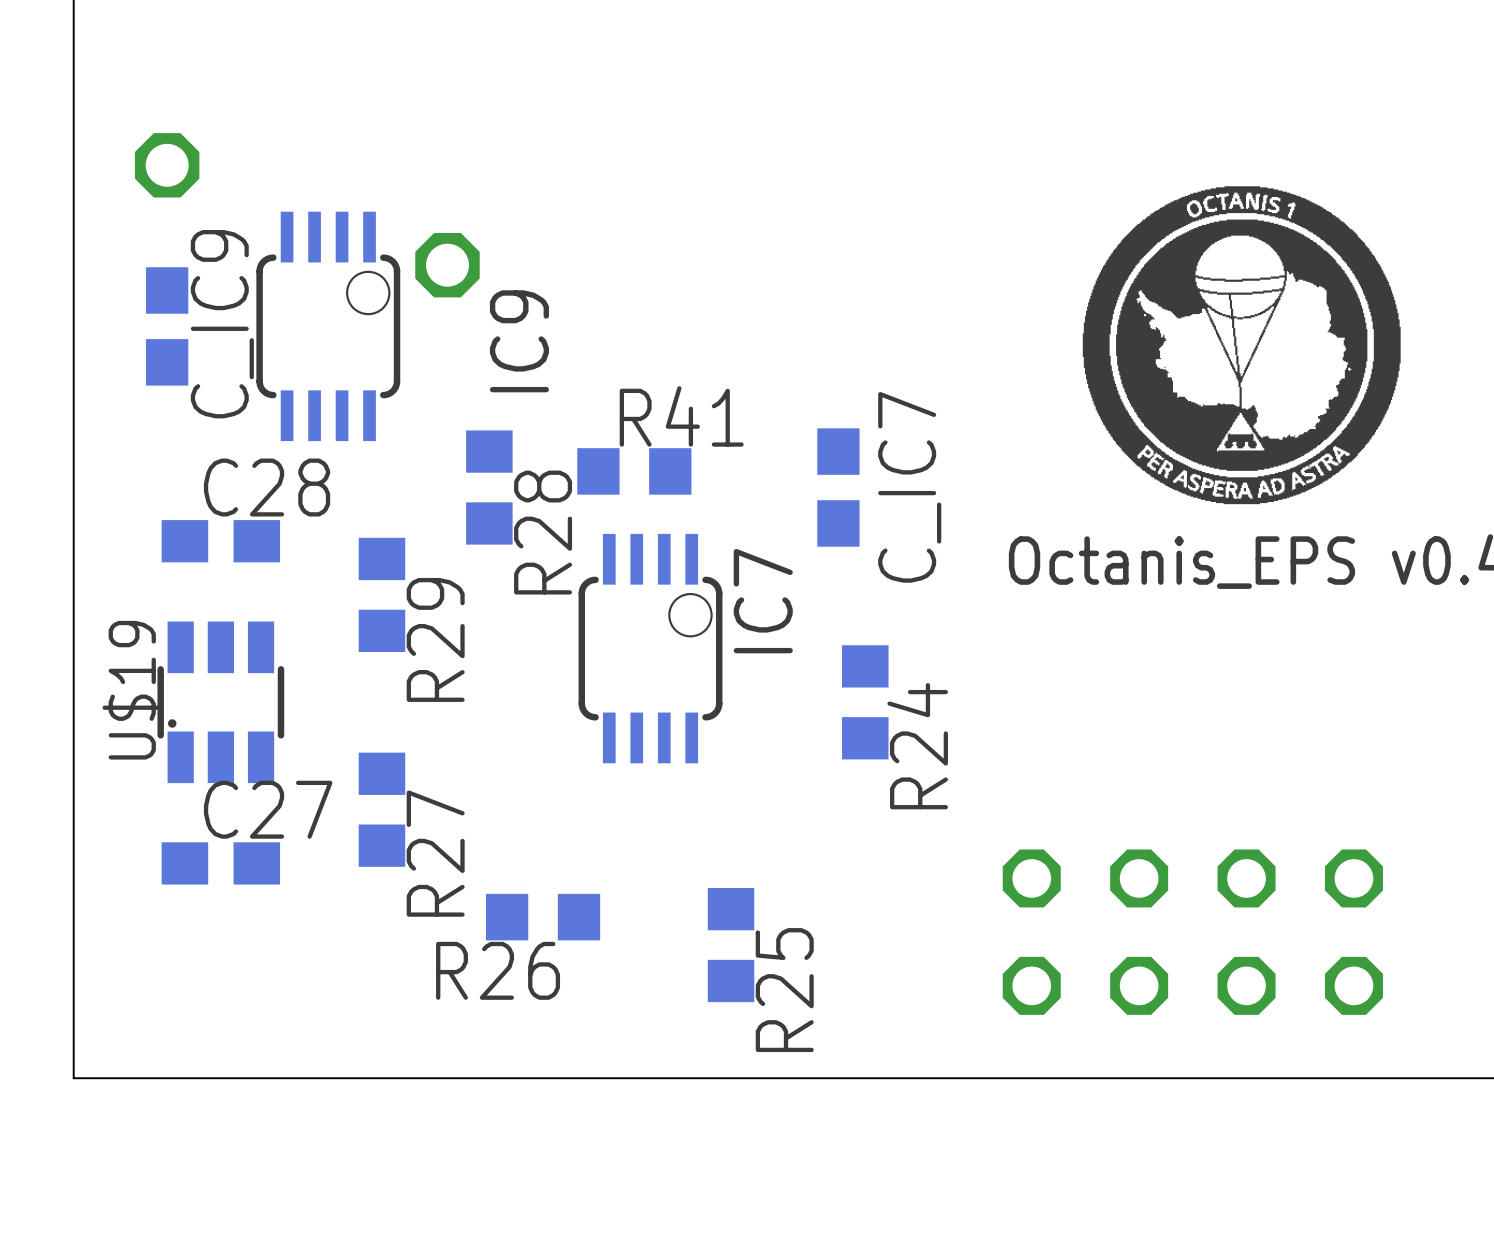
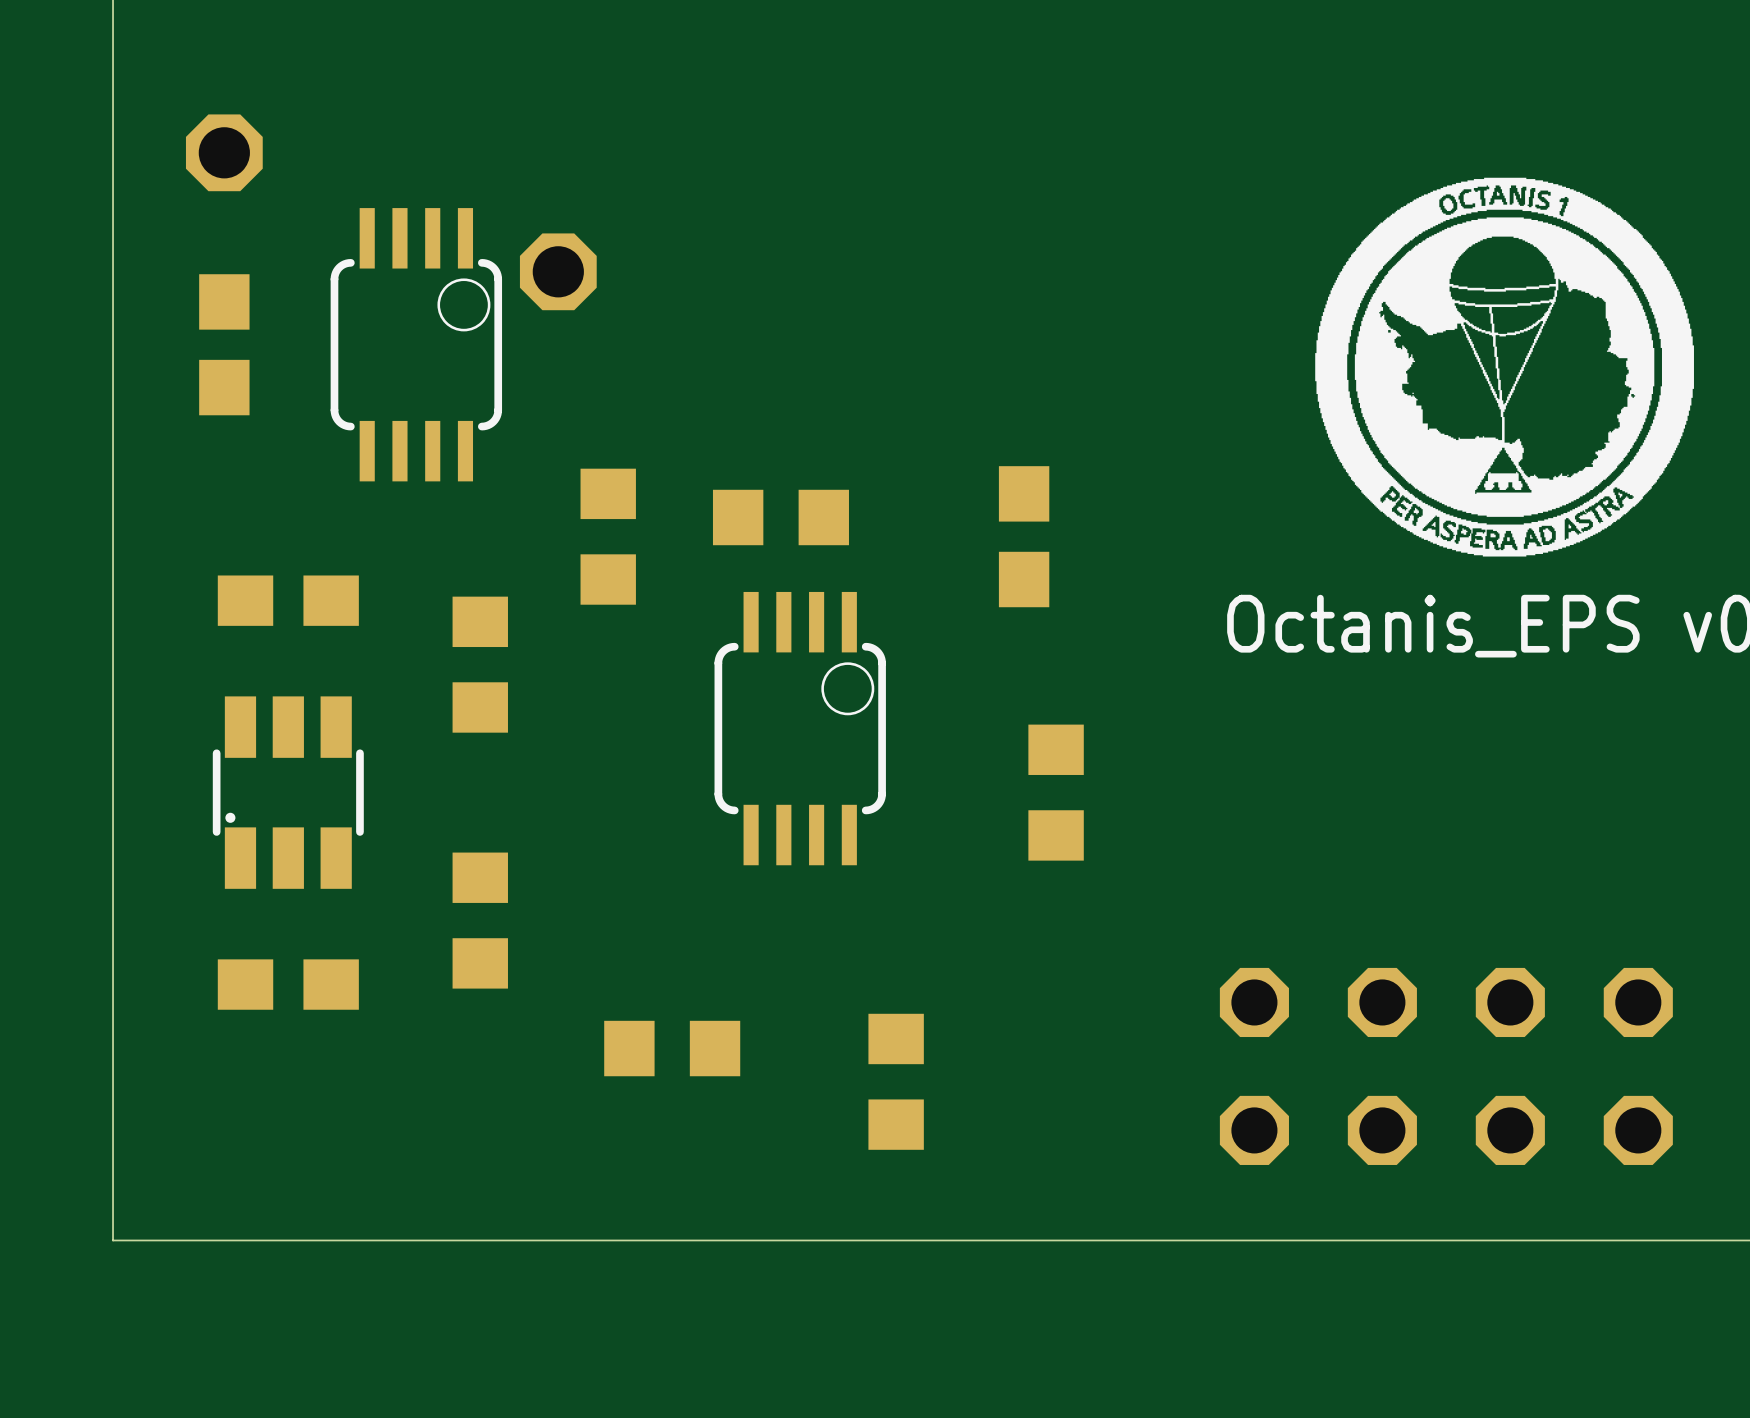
C_IC9 name: C_IC9 (222, 324) -> none
IC9 name: IC9 (519, 341) -> none
R41 name: R41 (681, 416) -> none
C28 name: C28 (267, 487) -> none
C_IC7 name: C_IC7 (909, 487) -> none
R28 name: R28 (543, 532) -> none
IC7 name: IC7 (763, 601) -> none
R29 name: R29 (435, 639) -> none
U$19 name: U$19 (132, 690) -> none
R24 name: R24 (917, 746) -> none
C27 name: C27 (268, 809) -> none
R27 name: R27 (435, 853) -> none
R26 name: R26 (498, 970) -> none
R25 name: R25 (784, 990) -> none

